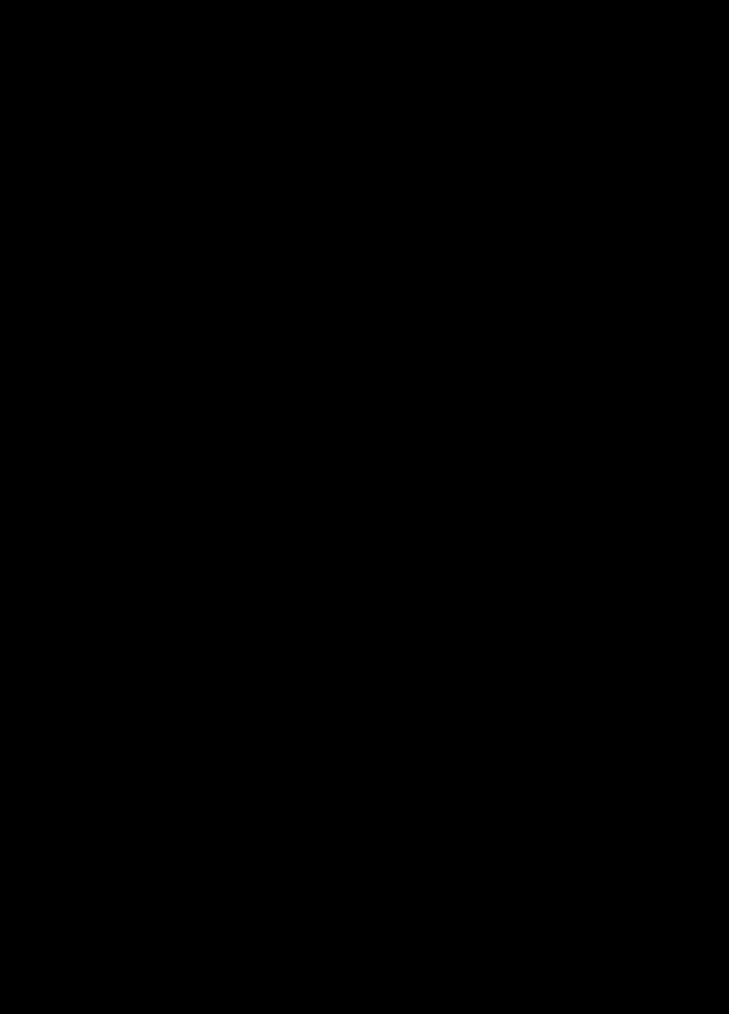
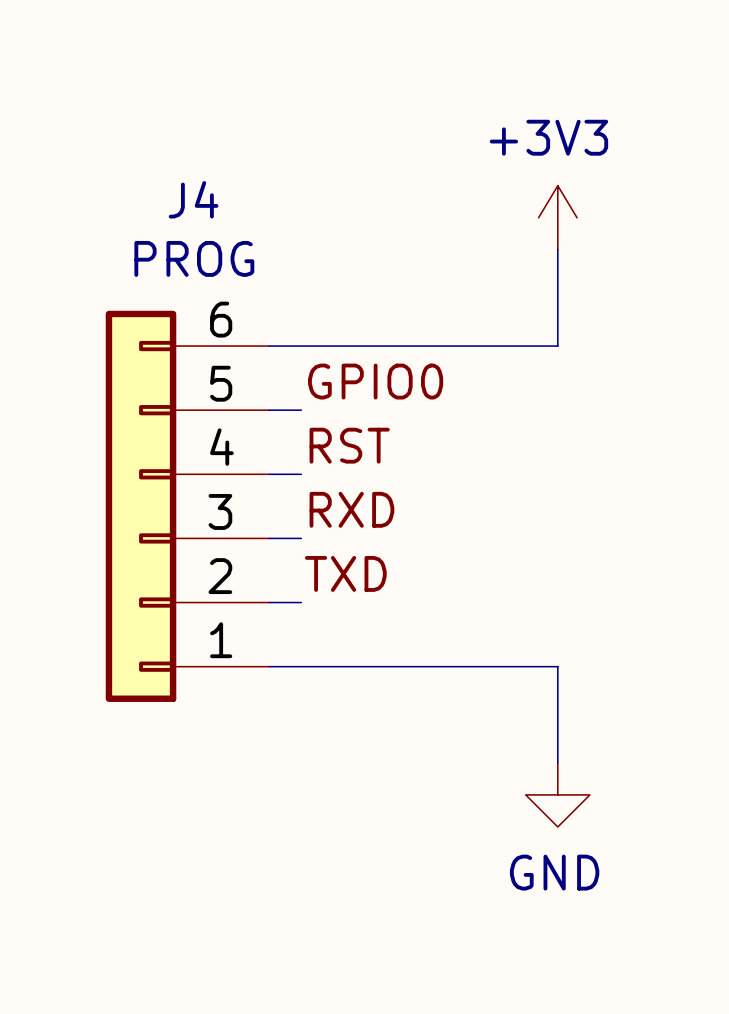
power symbol: none -> +3V3 (557, 217)
wire: none -> (557, 249) (557, 346) (269, 346)
label: none -> GPIO0 (375, 381)
wire: none -> (269, 410) (301, 410)
label: none -> RST (349, 445)
wire: none -> (269, 474) (301, 474)
J4: none -> PROG (187, 506)
label: none -> RXD (351, 509)
wire: none -> (269, 538) (301, 538)
label: none -> TXD (345, 573)
wire: none -> (269, 602) (301, 602)
wire: none -> (269, 666) (557, 666) (557, 762)
power symbol: none -> GND (557, 794)

